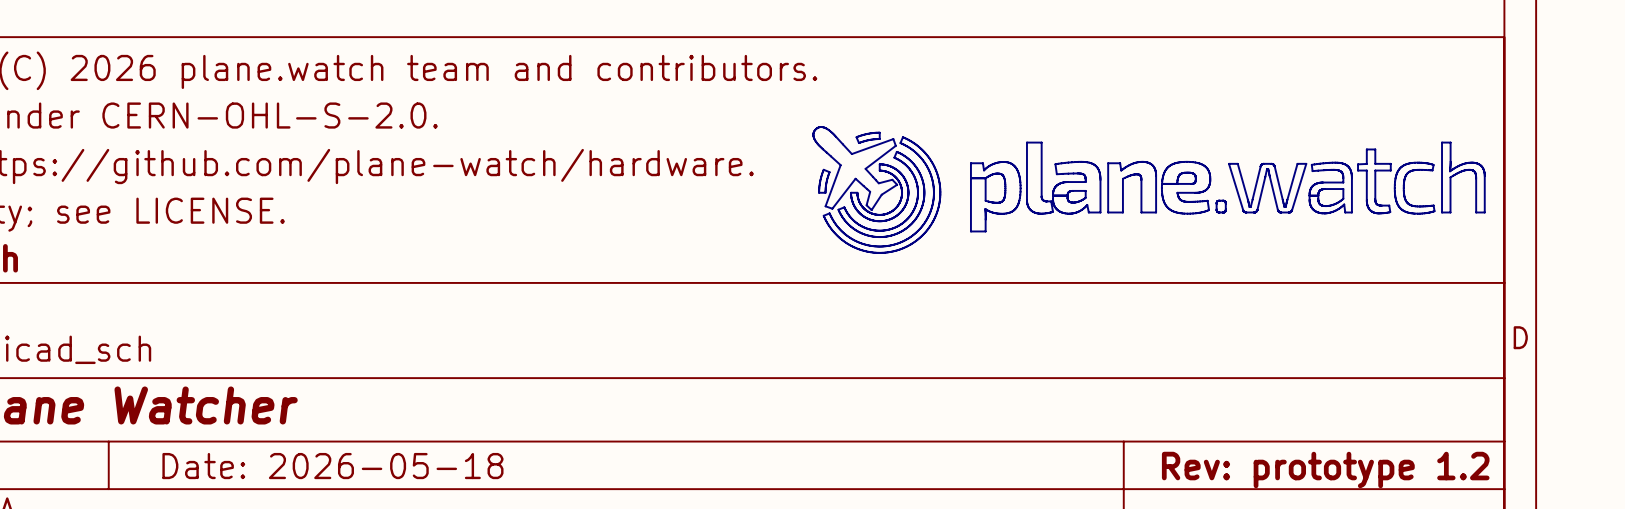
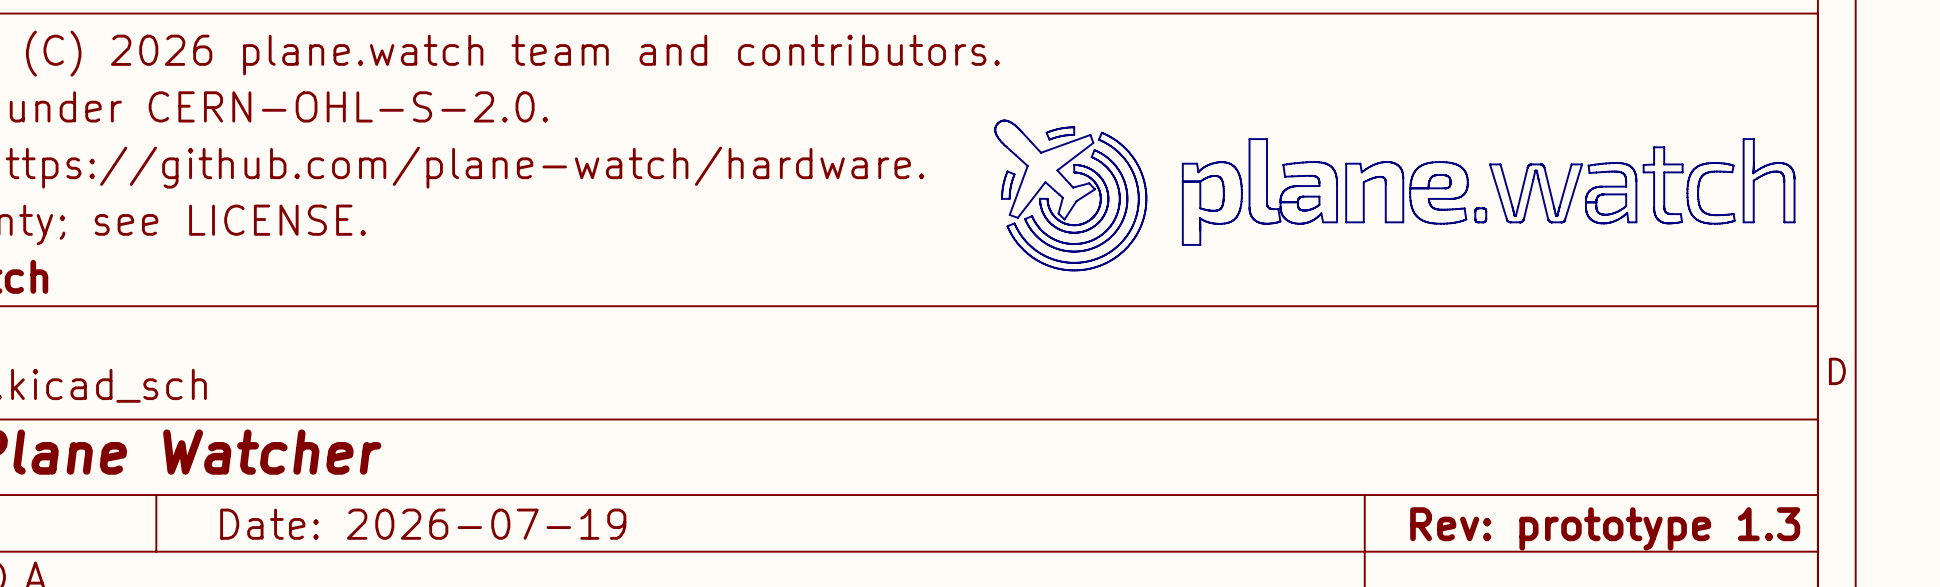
title block: Date: 2026-05-18 (332, 466) -> Date: 2026-07-19 (423, 524)
title block: Rev: prototype 1.2 (1325, 470) -> Rev: prototype 1.3 (1605, 528)

